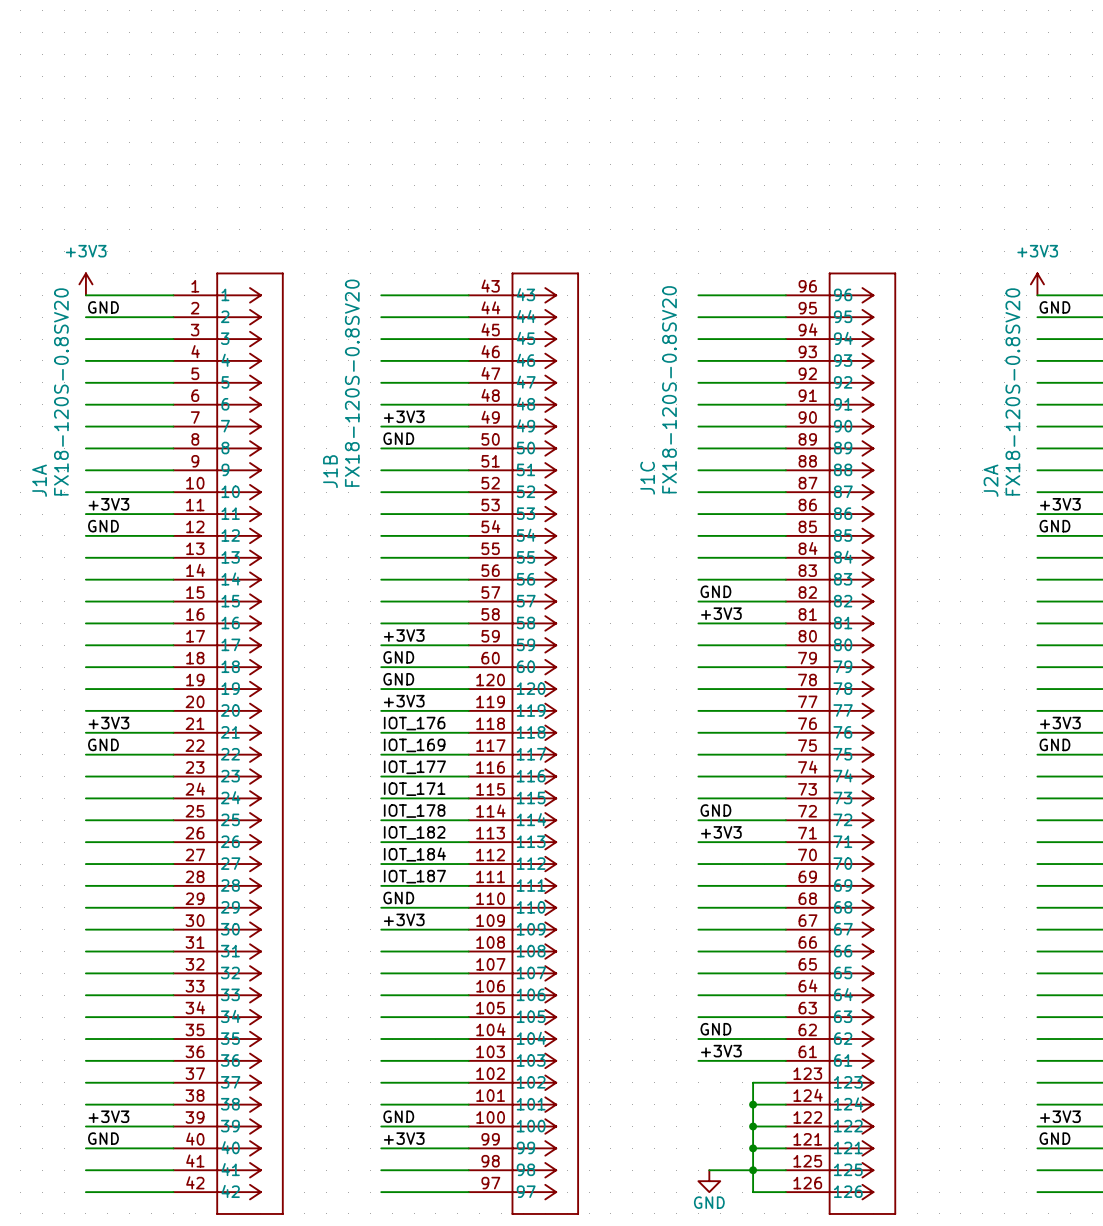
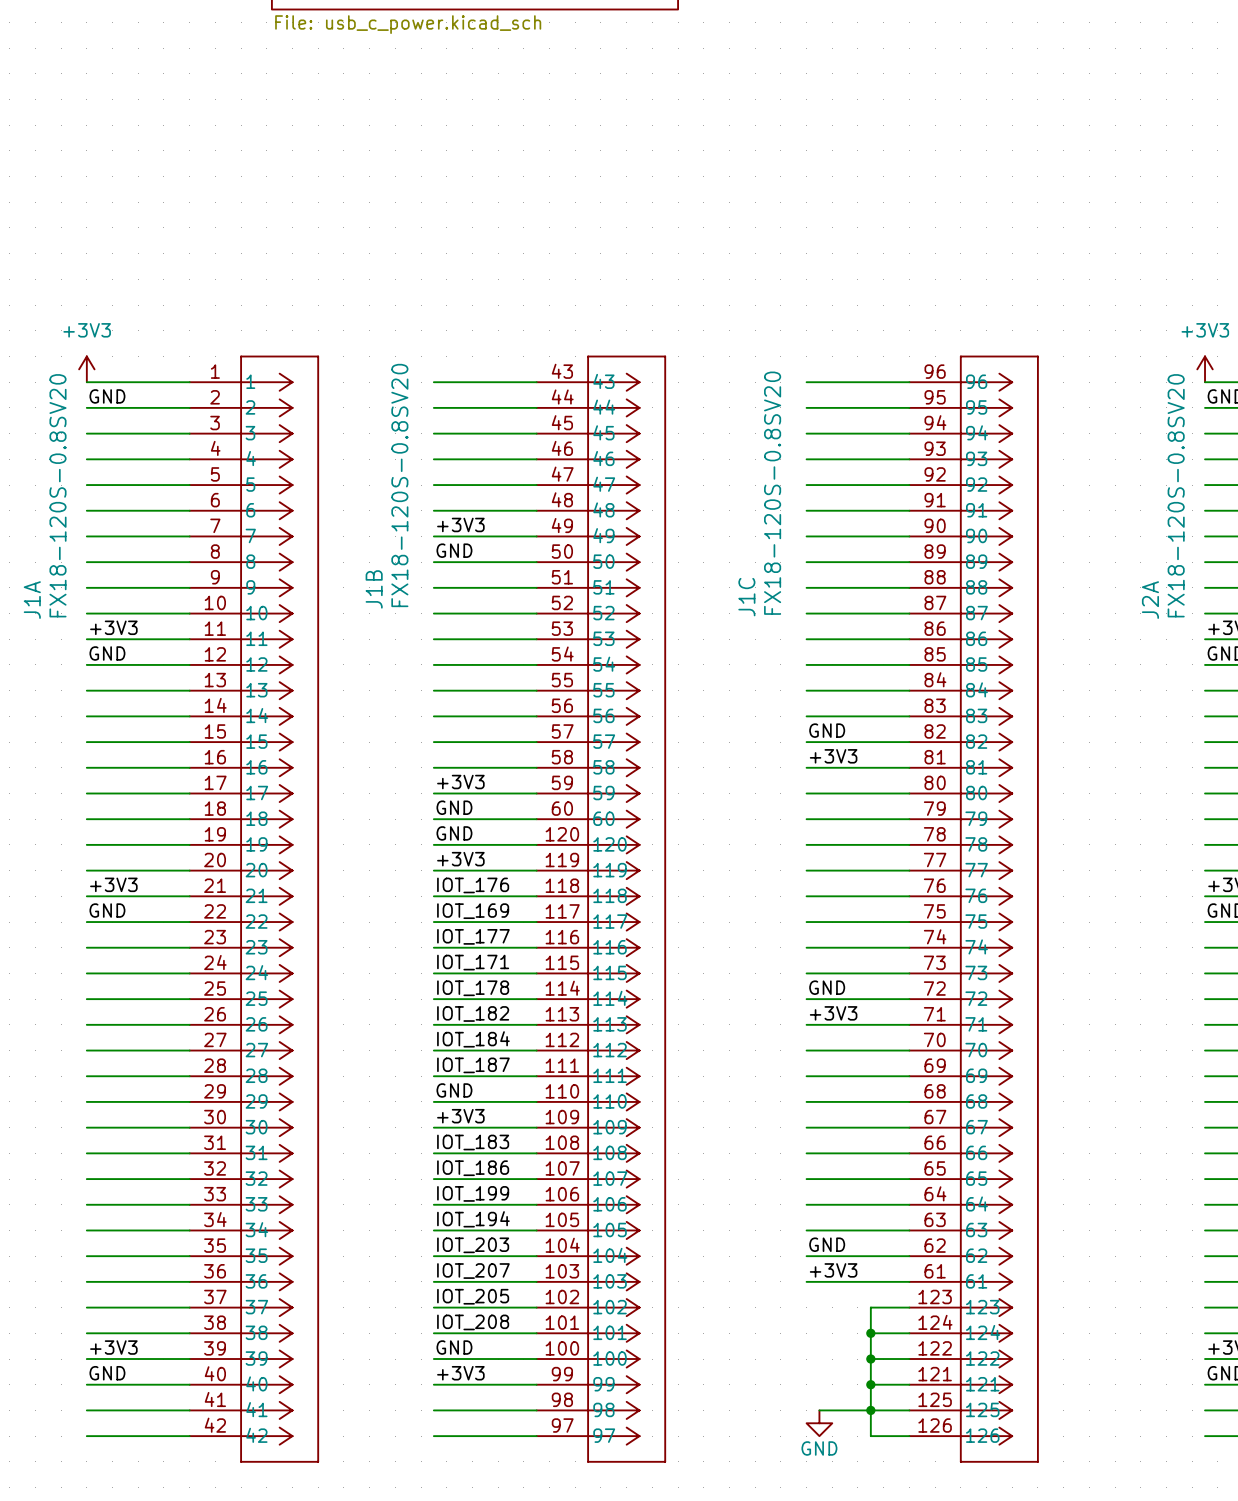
label: none -> IOT_183 (473, 1142)
label: none -> IOT_186 (473, 1168)
label: none -> IOT_199 (473, 1193)
label: none -> IOT_194 (473, 1219)
label: none -> IOT_203 (473, 1245)
label: none -> IOT_207 (473, 1271)
label: none -> IOT_205 (473, 1296)
label: none -> IOT_208 (473, 1322)

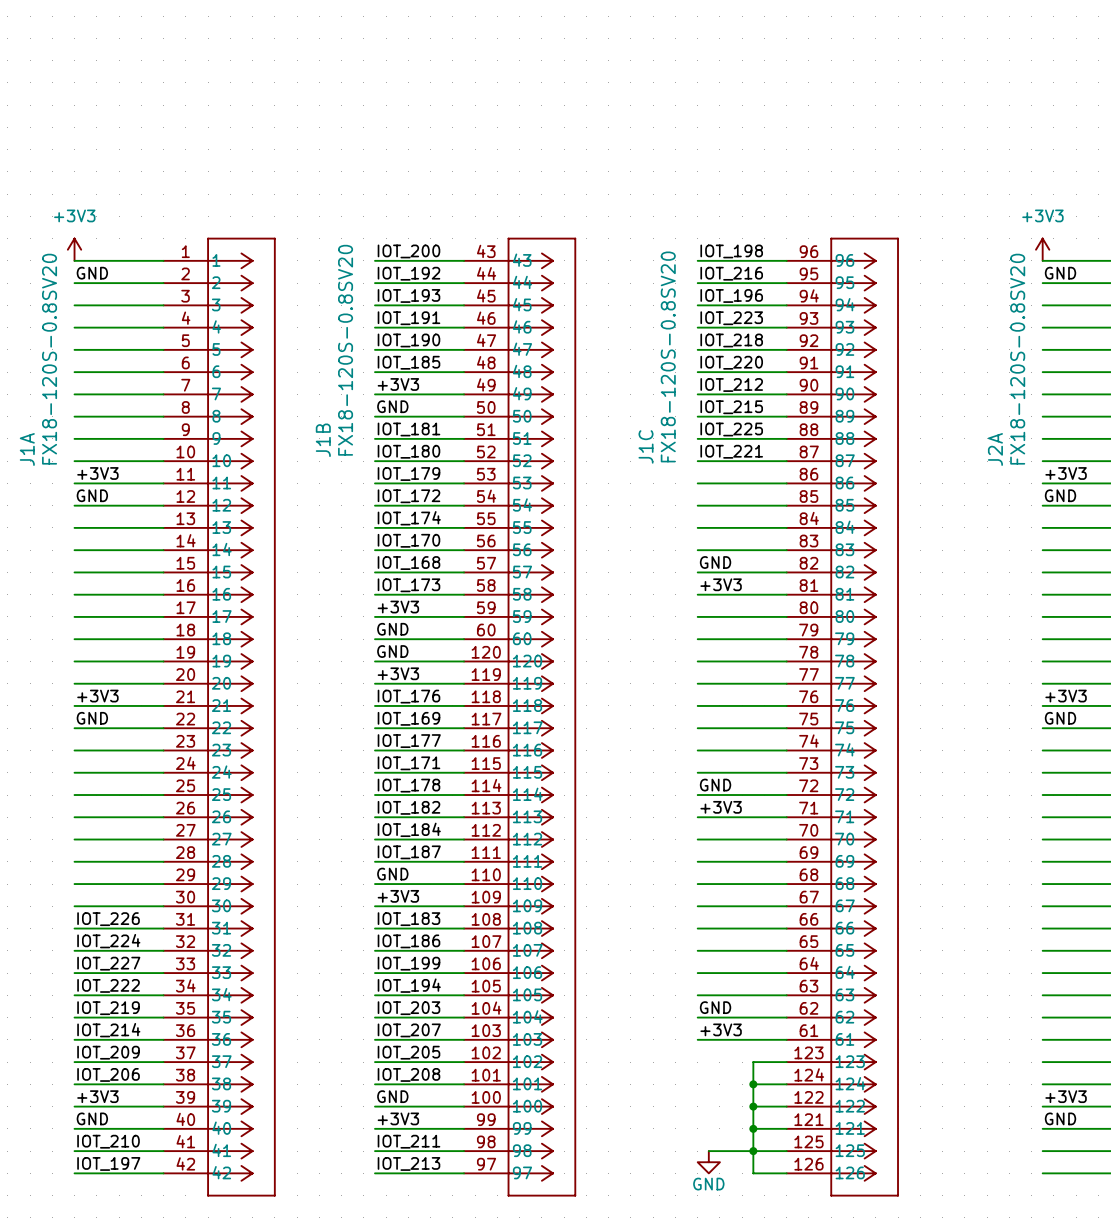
label: none -> IOT_200 (408, 251)
label: none -> IOT_198 (731, 251)
label: none -> IOT_192 (408, 273)
label: none -> IOT_216 (731, 273)
label: none -> IOT_193 (408, 295)
label: none -> IOT_196 (731, 295)
label: none -> IOT_191 (408, 318)
label: none -> IOT_223 (731, 318)
label: none -> IOT_190 (408, 340)
label: none -> IOT_218 (731, 340)
label: none -> IOT_185 (408, 362)
label: none -> IOT_220 (731, 362)
label: none -> IOT_212 (731, 384)
label: none -> IOT_215 (731, 407)
label: none -> IOT_181 (408, 429)
label: none -> IOT_225 (731, 429)
label: none -> IOT_180 (408, 451)
label: none -> IOT_221 (731, 451)
label: none -> IOT_179 (408, 474)
label: none -> IOT_172 (408, 496)
label: none -> IOT_174 (409, 518)
label: none -> IOT_170 (408, 540)
label: none -> IOT_168 (408, 563)
label: none -> IOT_173 (408, 585)
label: none -> IOT_226 (108, 919)
label: none -> IOT_224 (108, 941)
label: none -> IOT_227 (108, 963)
label: none -> IOT_222 (108, 985)
label: none -> IOT_219 (108, 1008)
label: none -> IOT_214 (108, 1030)
label: none -> IOT_209 (108, 1052)
label: none -> IOT_206 (108, 1074)
label: none -> IOT_210 (108, 1141)
label: none -> IOT_211 (408, 1141)
label: none -> IOT_197 (108, 1163)
label: none -> IOT_213 (408, 1163)

